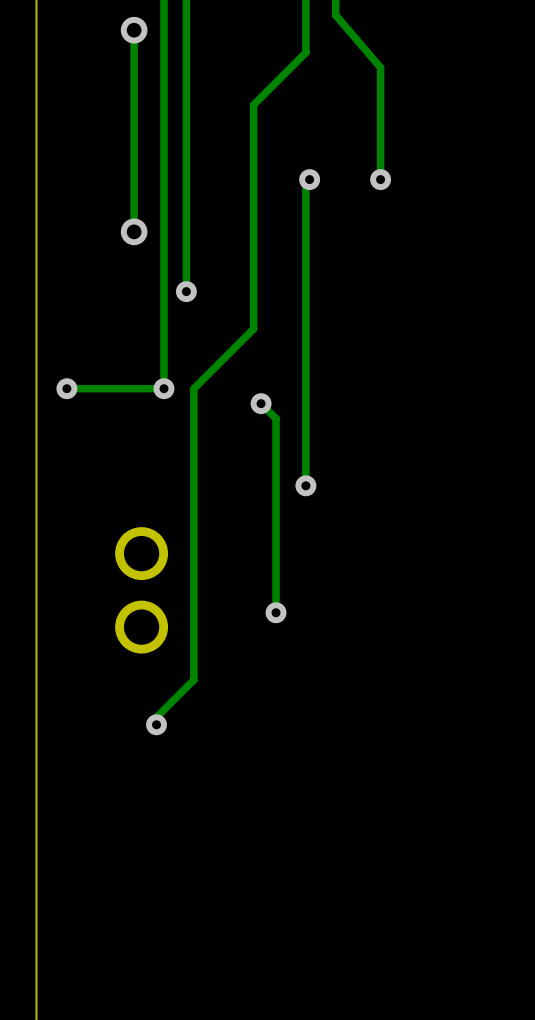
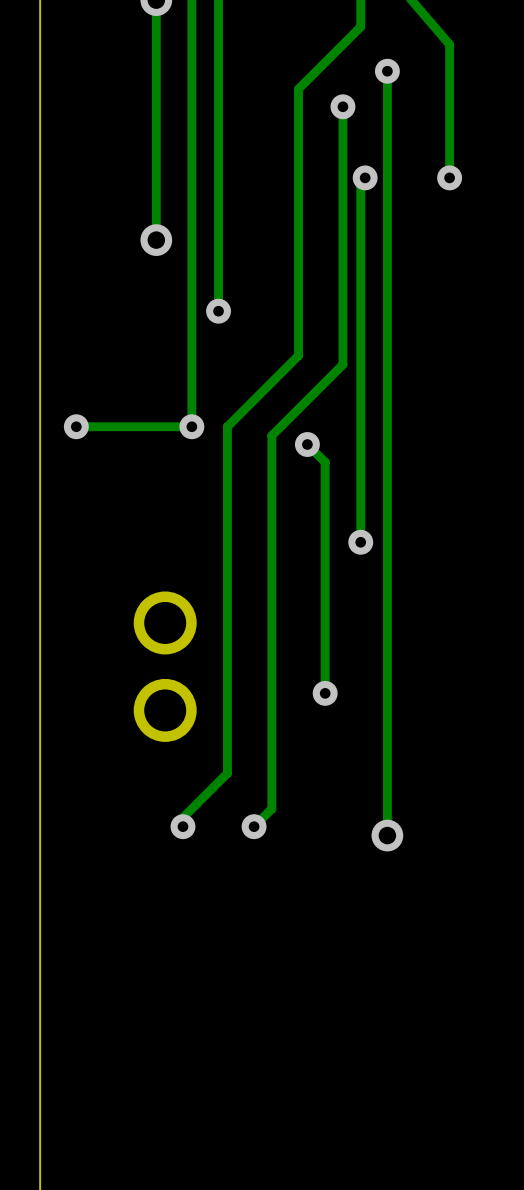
track: none -> (387, 71) (387, 835)
via: none -> (387, 71)
track: none -> (342, 106) (342, 364) (271, 435) (271, 808) (254, 826)
via: none -> (342, 106)
via: none -> (254, 826)
via: none -> (387, 835)

